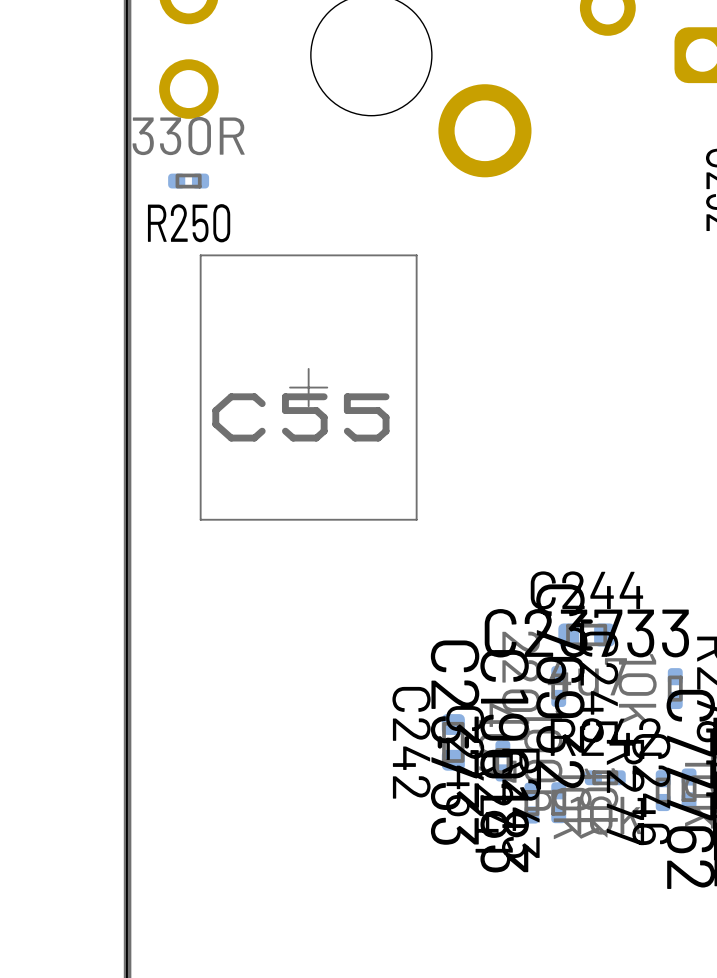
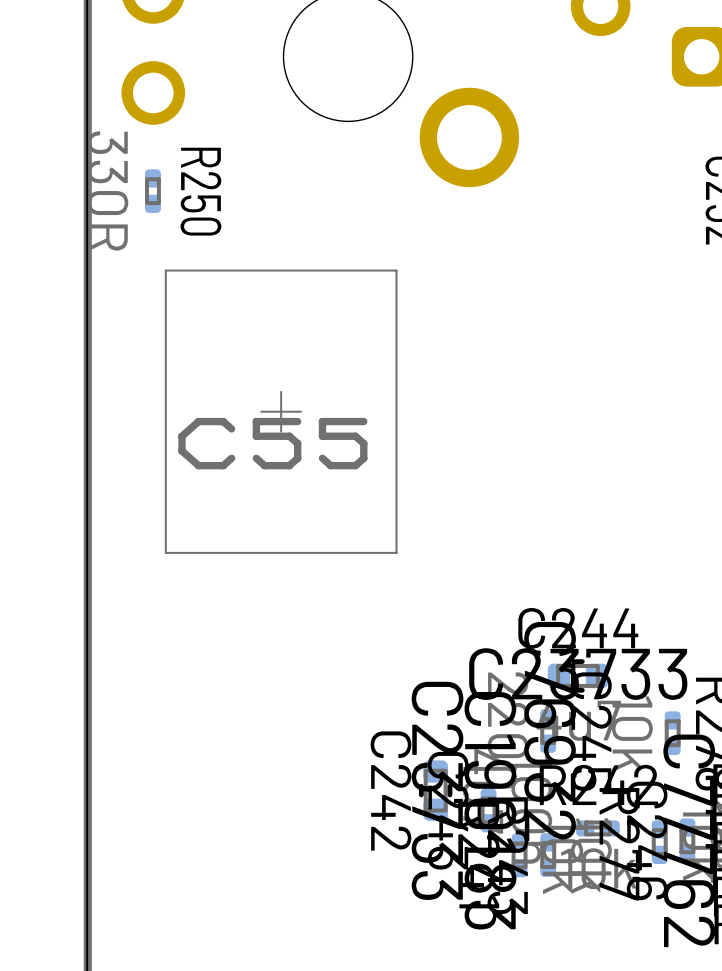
R250 rotation: 0° (188, 181) -> 90° clockwise (152, 191)

